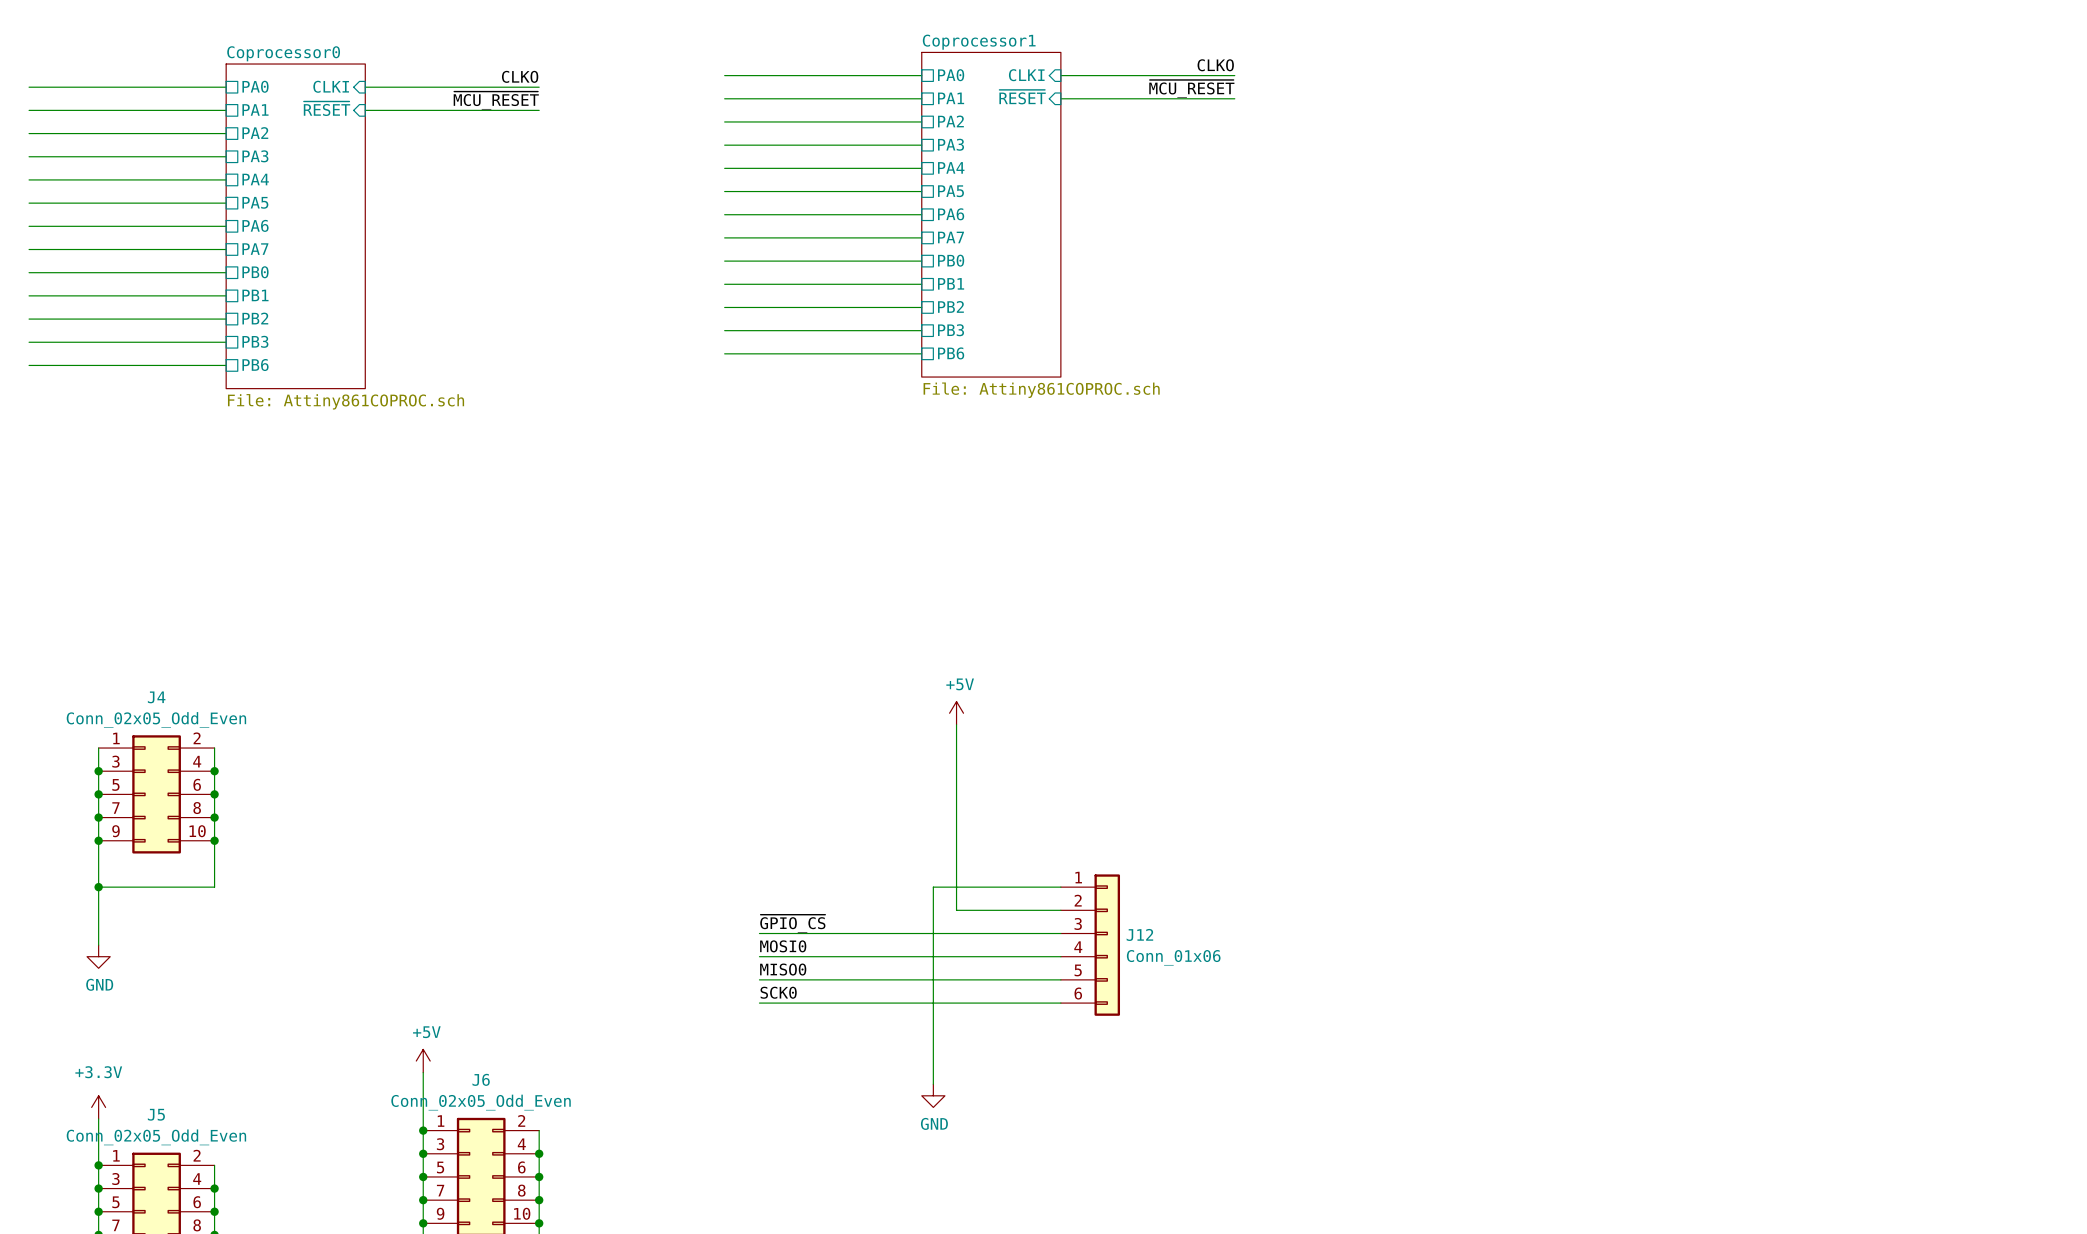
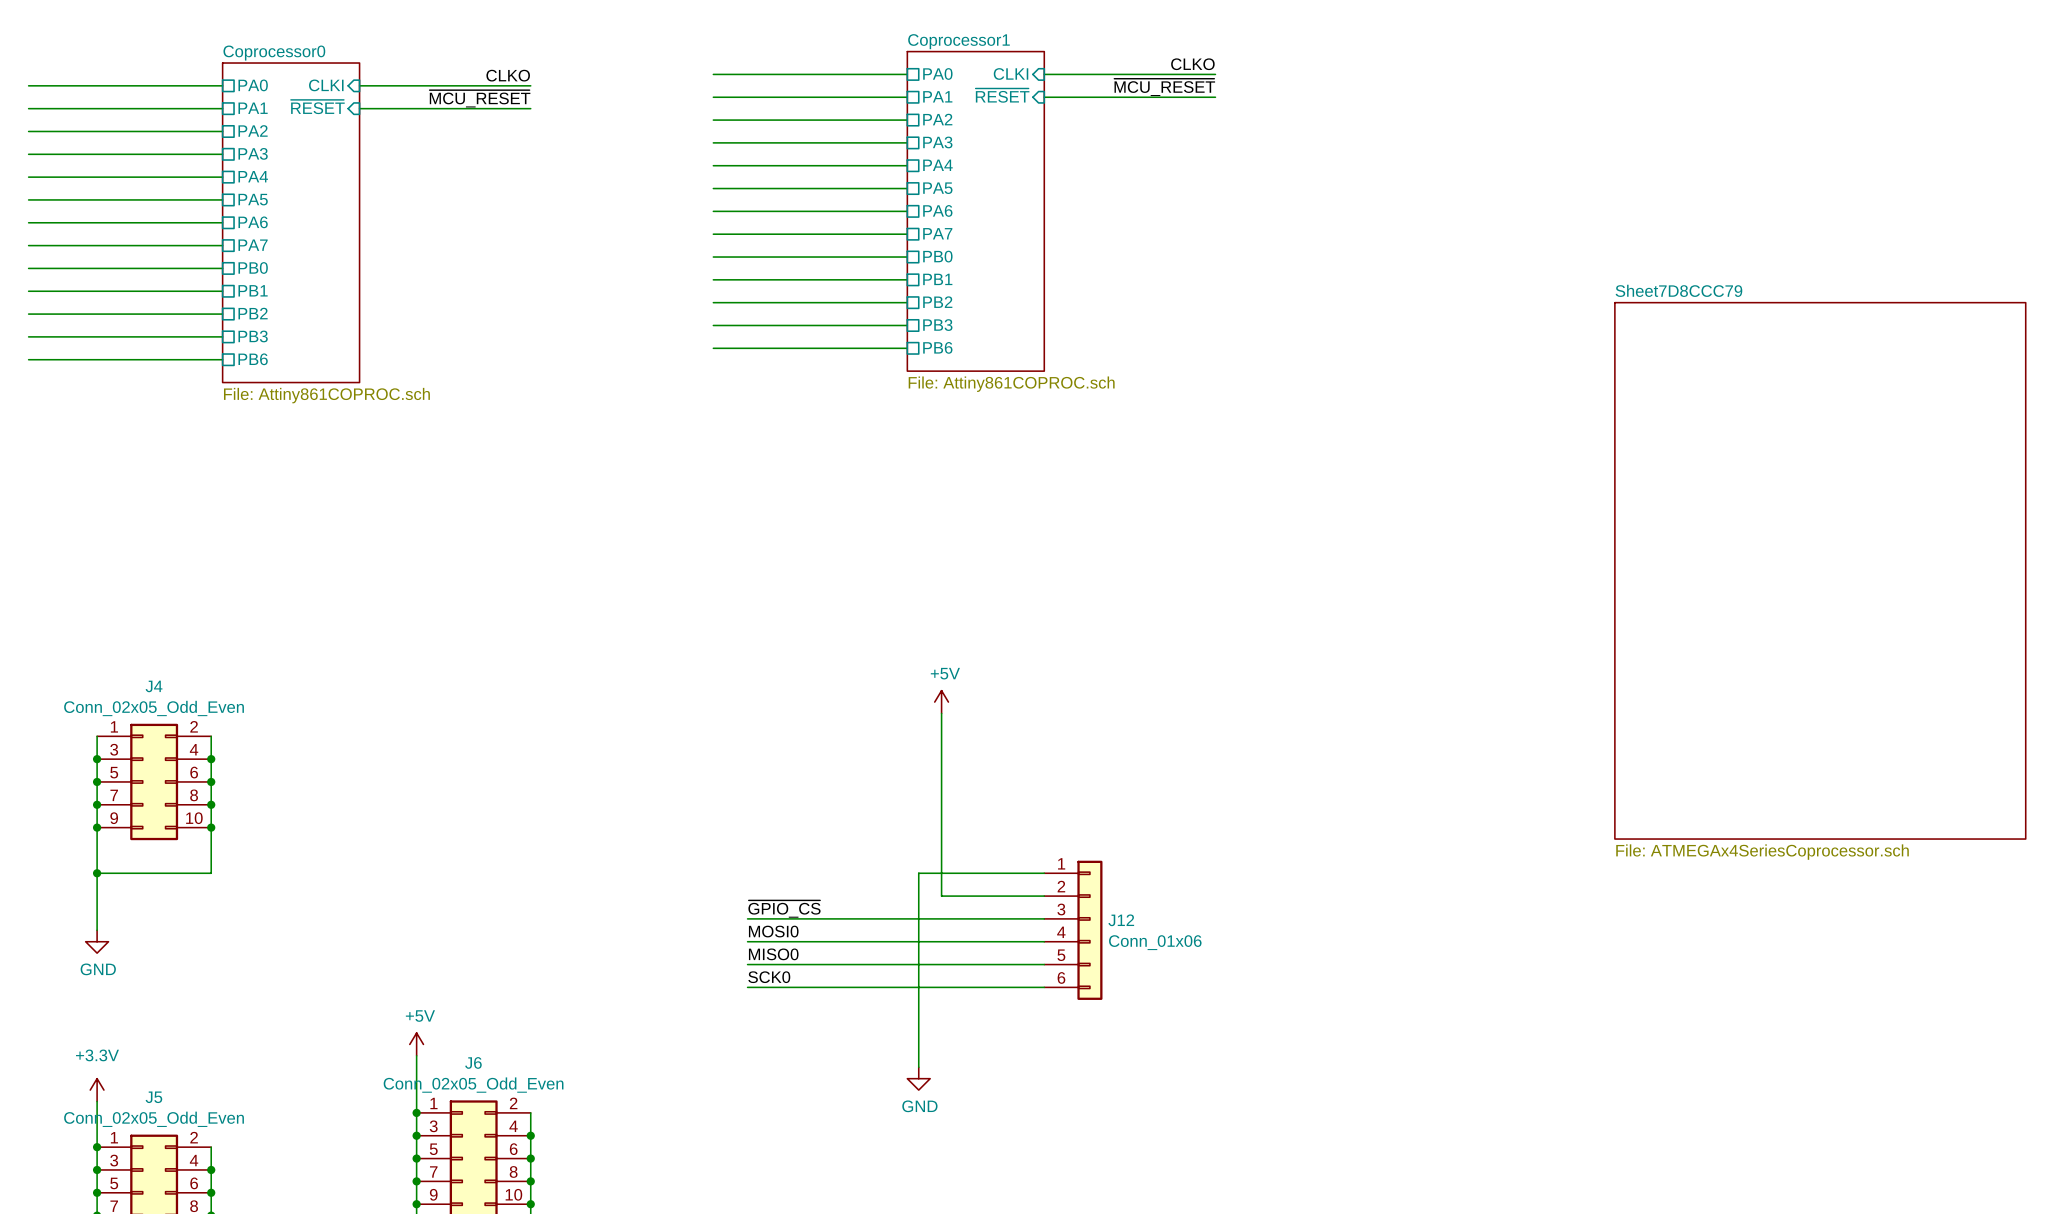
sheet Sheet7D8CCC79: none -> File: ATMEGAx4SeriesCoprocessor.sch (1820, 570)

